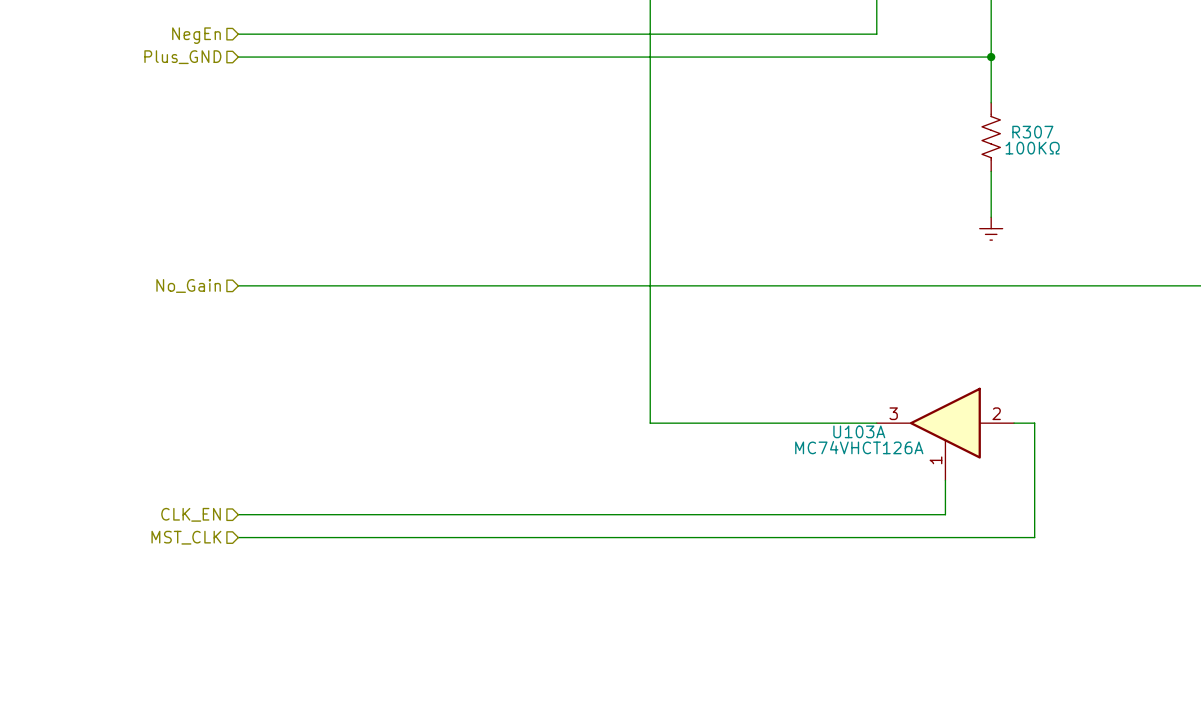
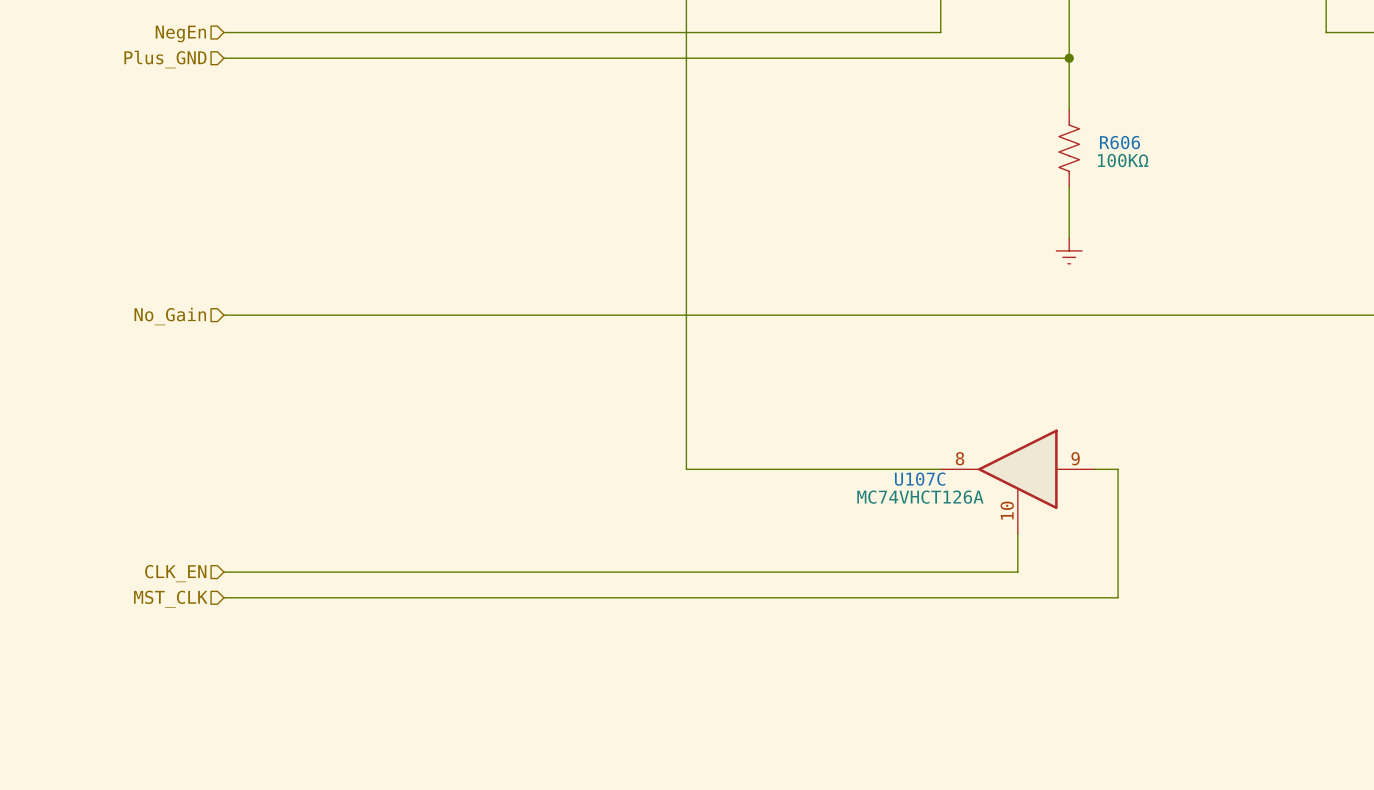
R307 name: R307 (1032, 132) -> R606 (1119, 142)
U103A pin number: 3 (893, 413) -> 8 (960, 458)
U103A pin number: 2 (996, 413) -> 9 (1075, 458)
U103A name: U103A (859, 431) -> U107C (920, 479)
U103A pin number: 1 (935, 460) -> 10 (1007, 510)

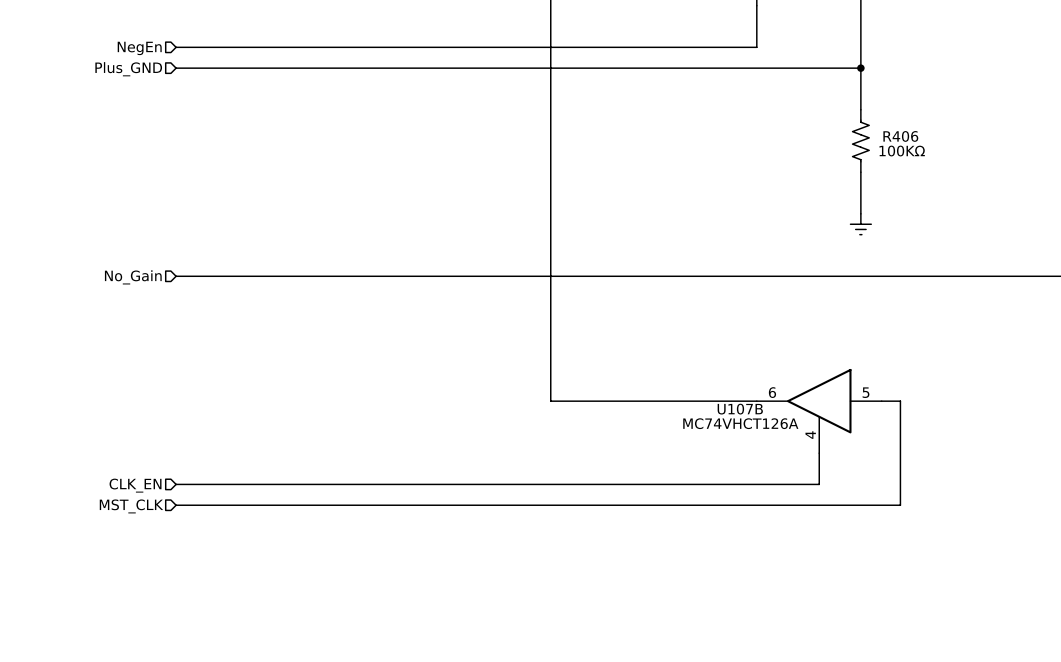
R606 name: R606 (1119, 142) -> R406 (900, 136)
U107C pin number: 8 (960, 458) -> 6 (772, 392)
U107C pin number: 9 (1075, 458) -> 5 (866, 392)
U107C name: U107C (920, 479) -> U107B (740, 409)
U107C pin number: 10 (1007, 510) -> 4 (810, 435)

